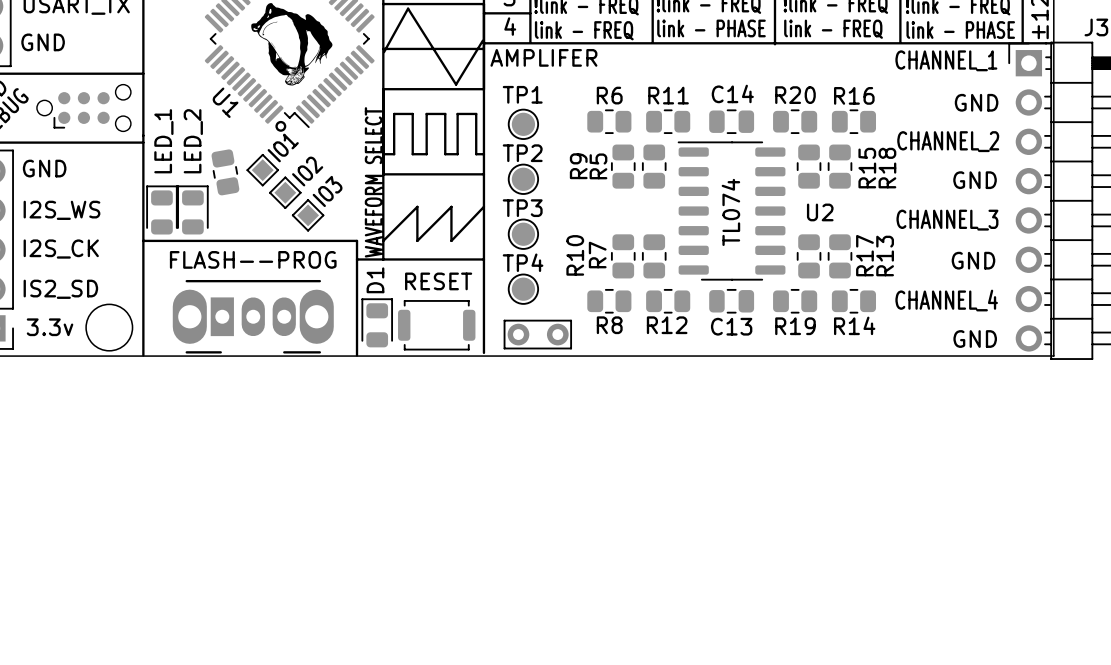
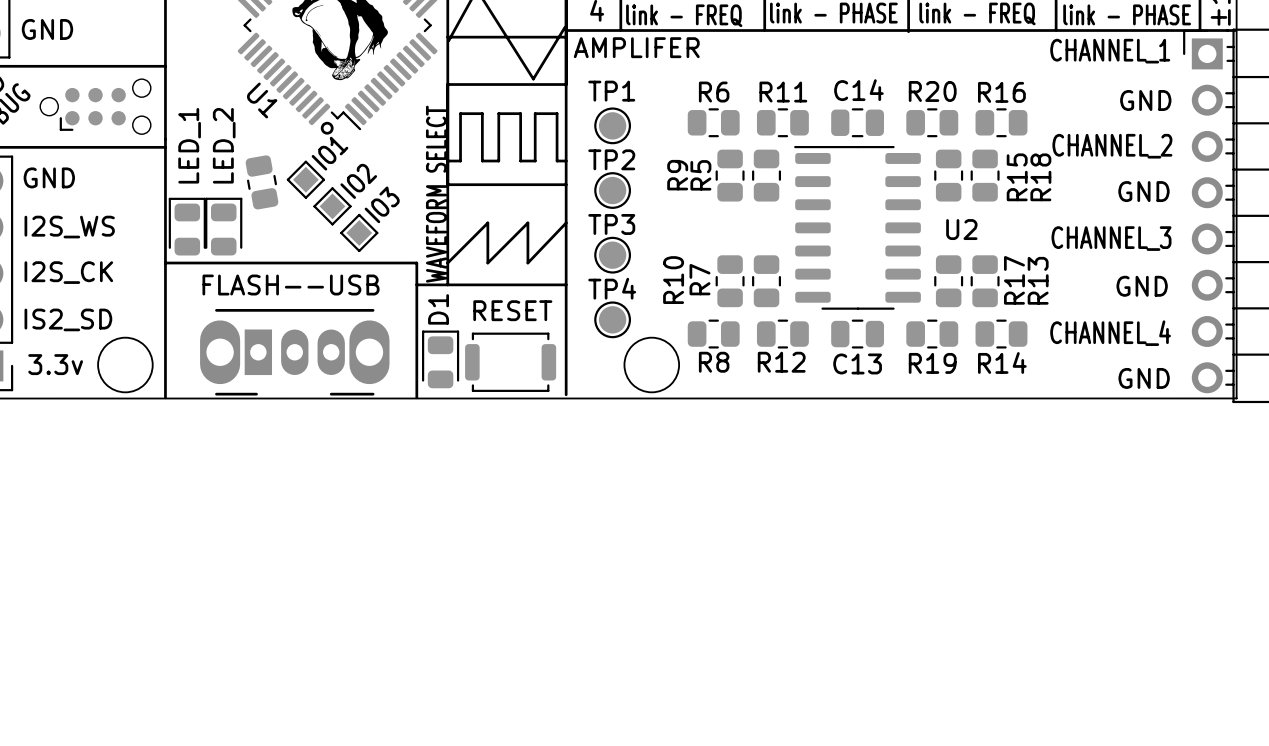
text: TL074 (730, 212) -> none
text: FLASH--PROG (253, 259) -> FLASH--USB (291, 285)
round board edge: none -> [623, 336, 681, 394]
part: (537, 334) -> none

